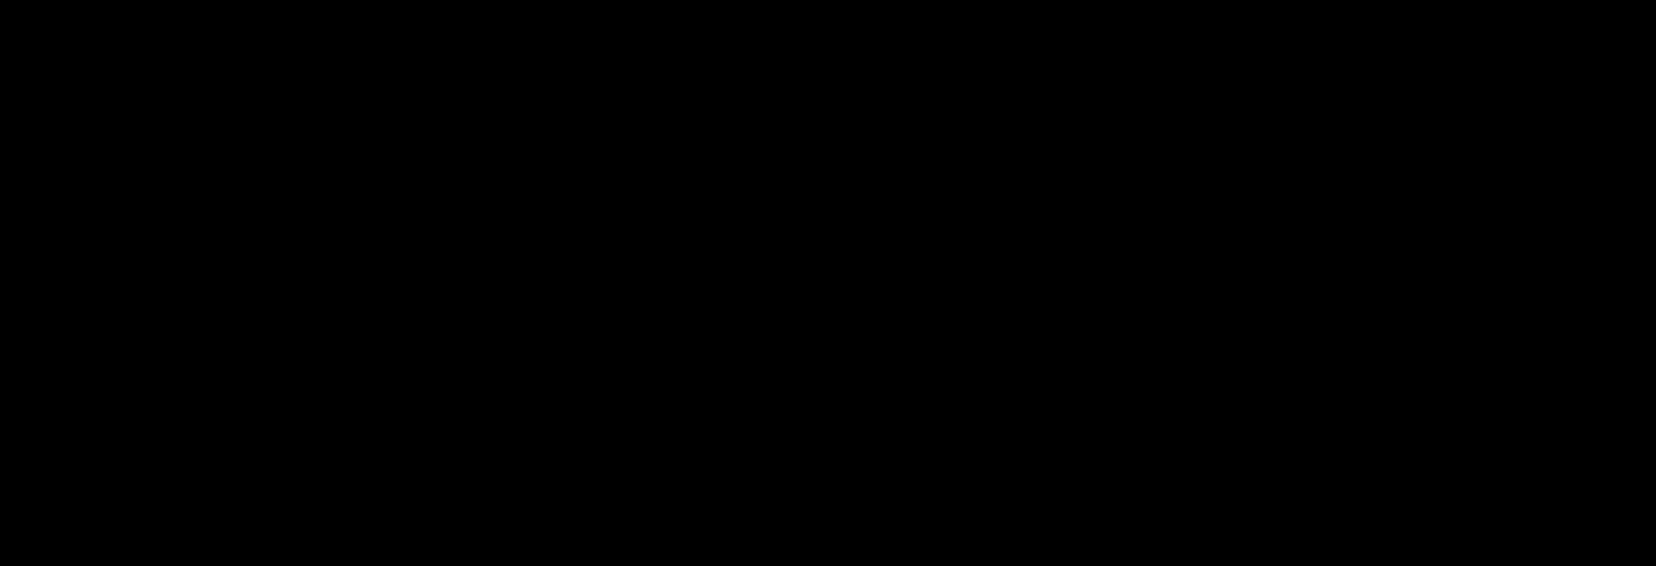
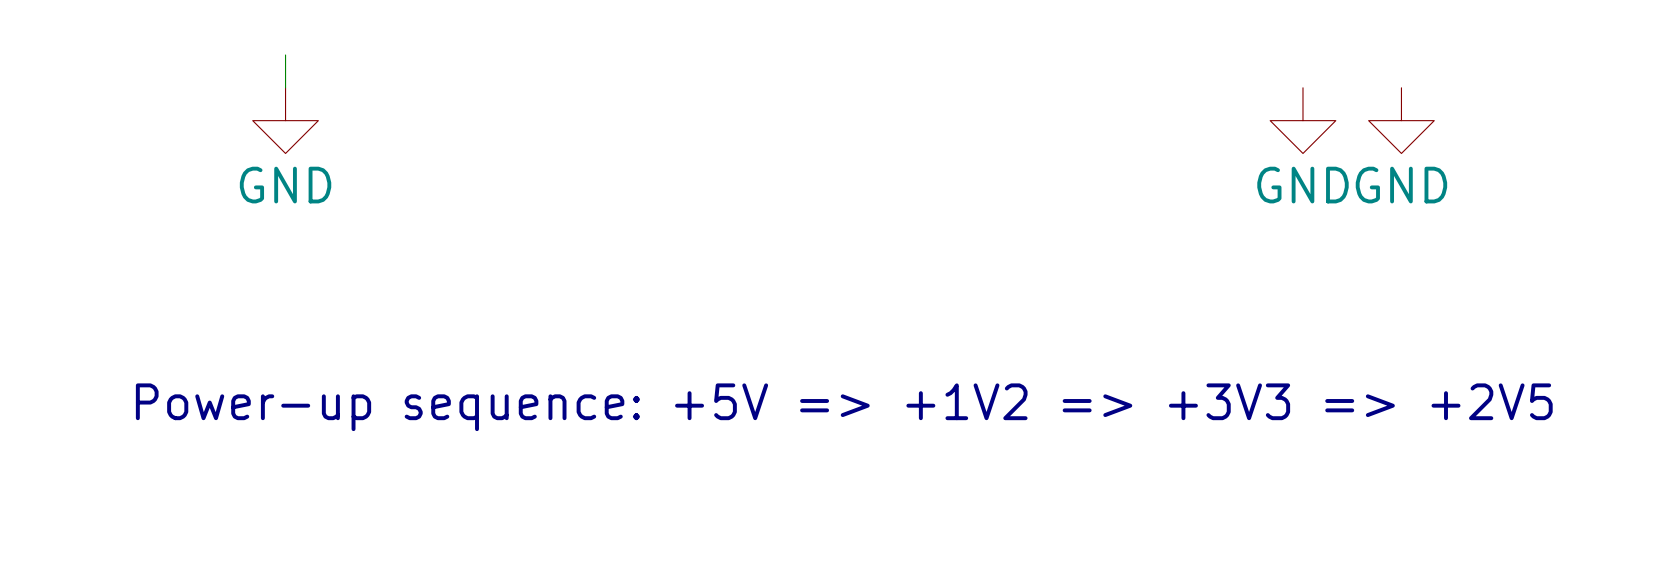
wire: none -> (285, 55) (285, 87)
power symbol: none -> GND (285, 120)
power symbol: none -> GND (1302, 120)
power symbol: none -> GND (1401, 120)
text: none -> Power-up sequence: +5V => +1V2 => +3V3 => +2V5 (844, 407)

